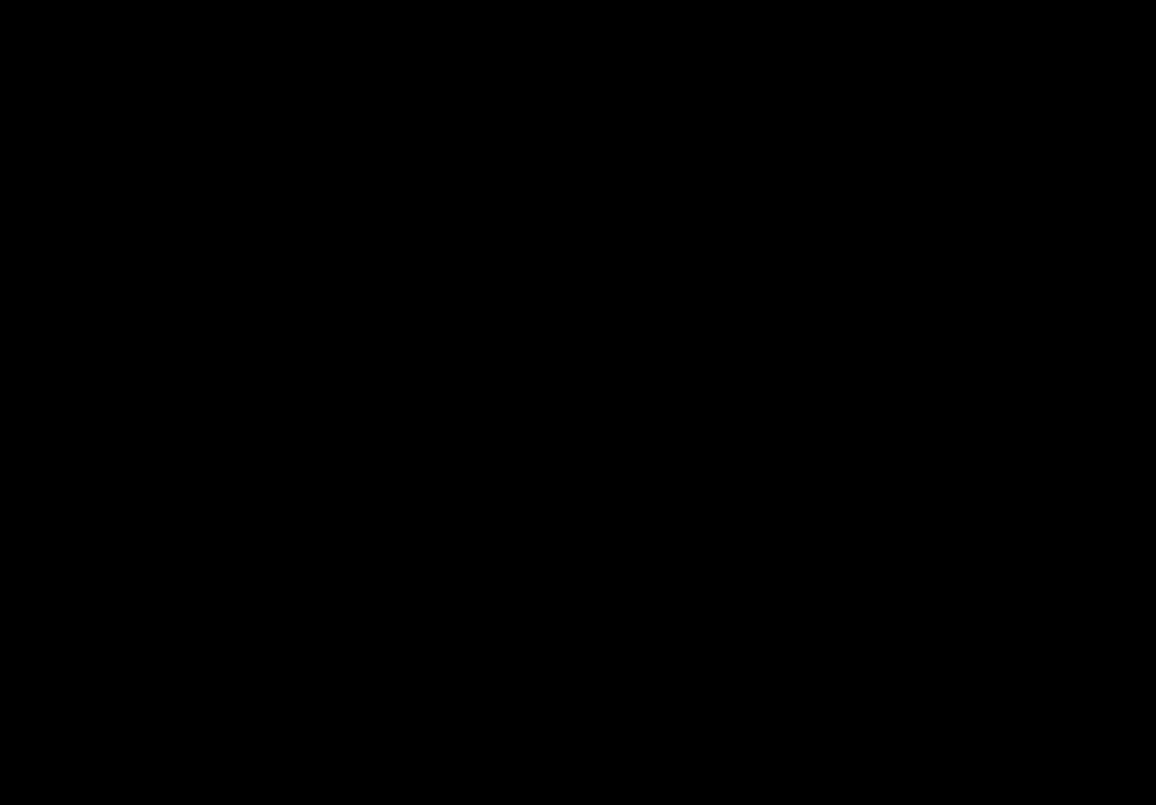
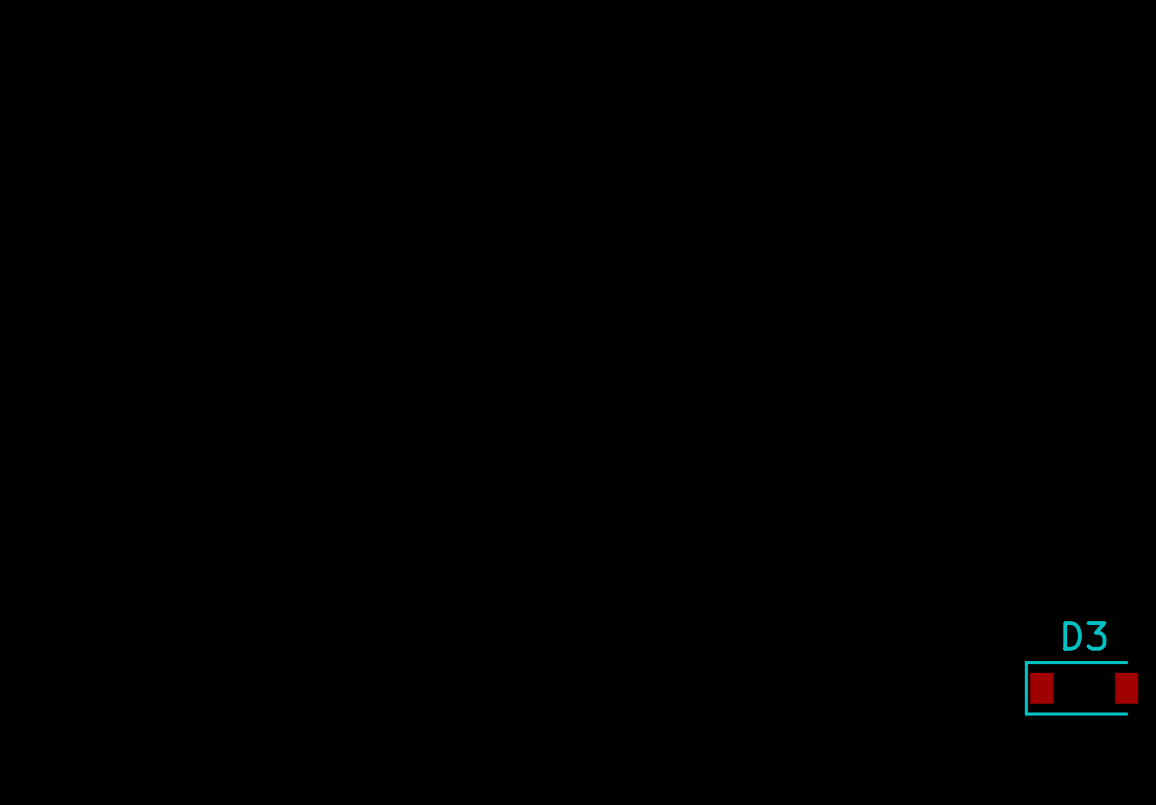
D3: none -> (1081, 688)

